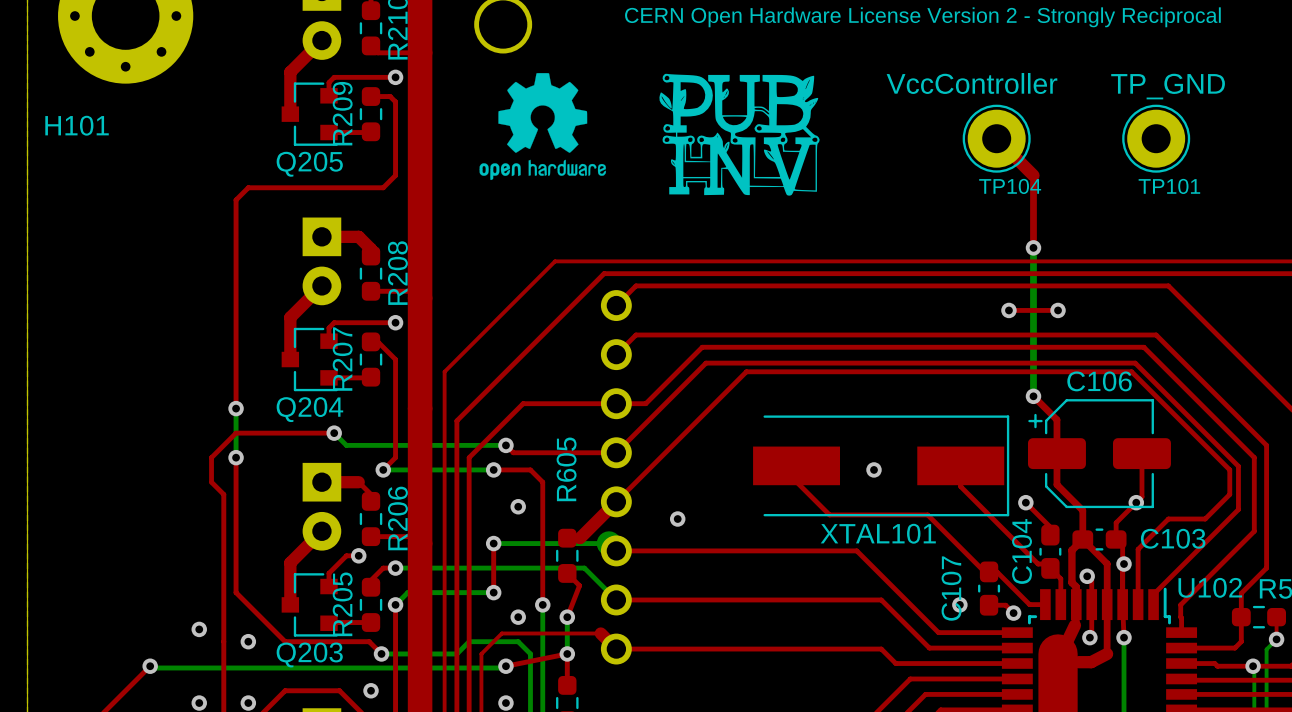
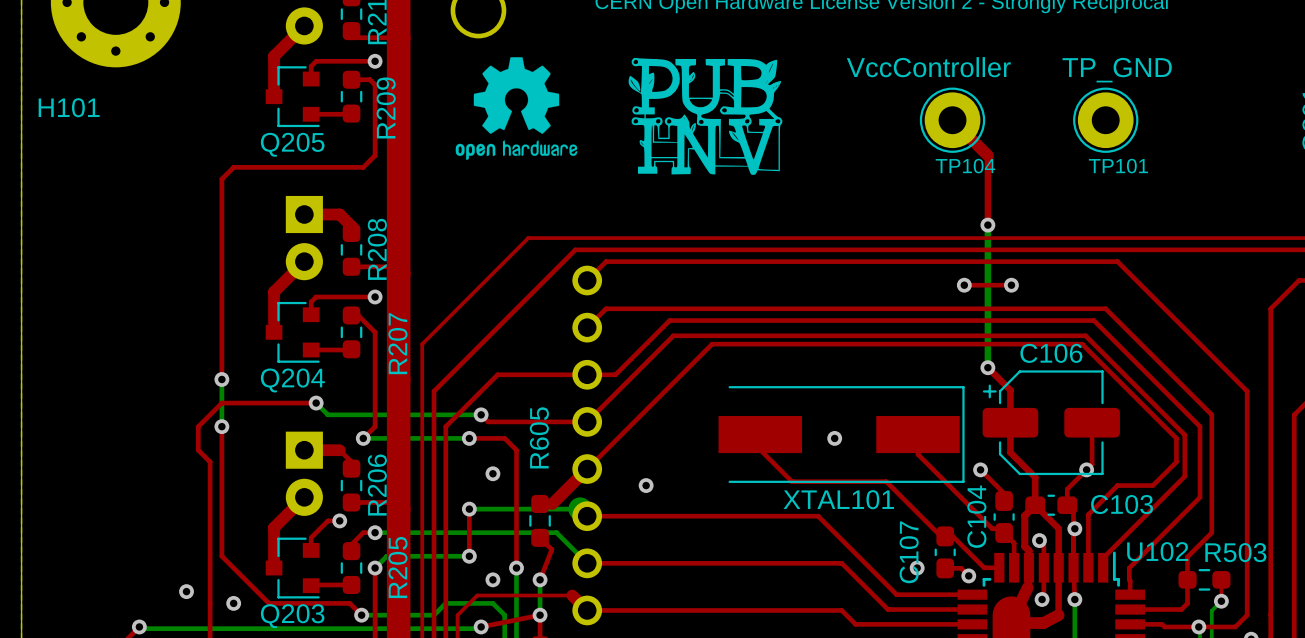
R209 name position: R209 (342, 113) -> R209 (386, 107)
R207 name position: R207 (342, 359) -> R207 (397, 343)
R205 name position: R205 (342, 604) -> R205 (397, 567)

